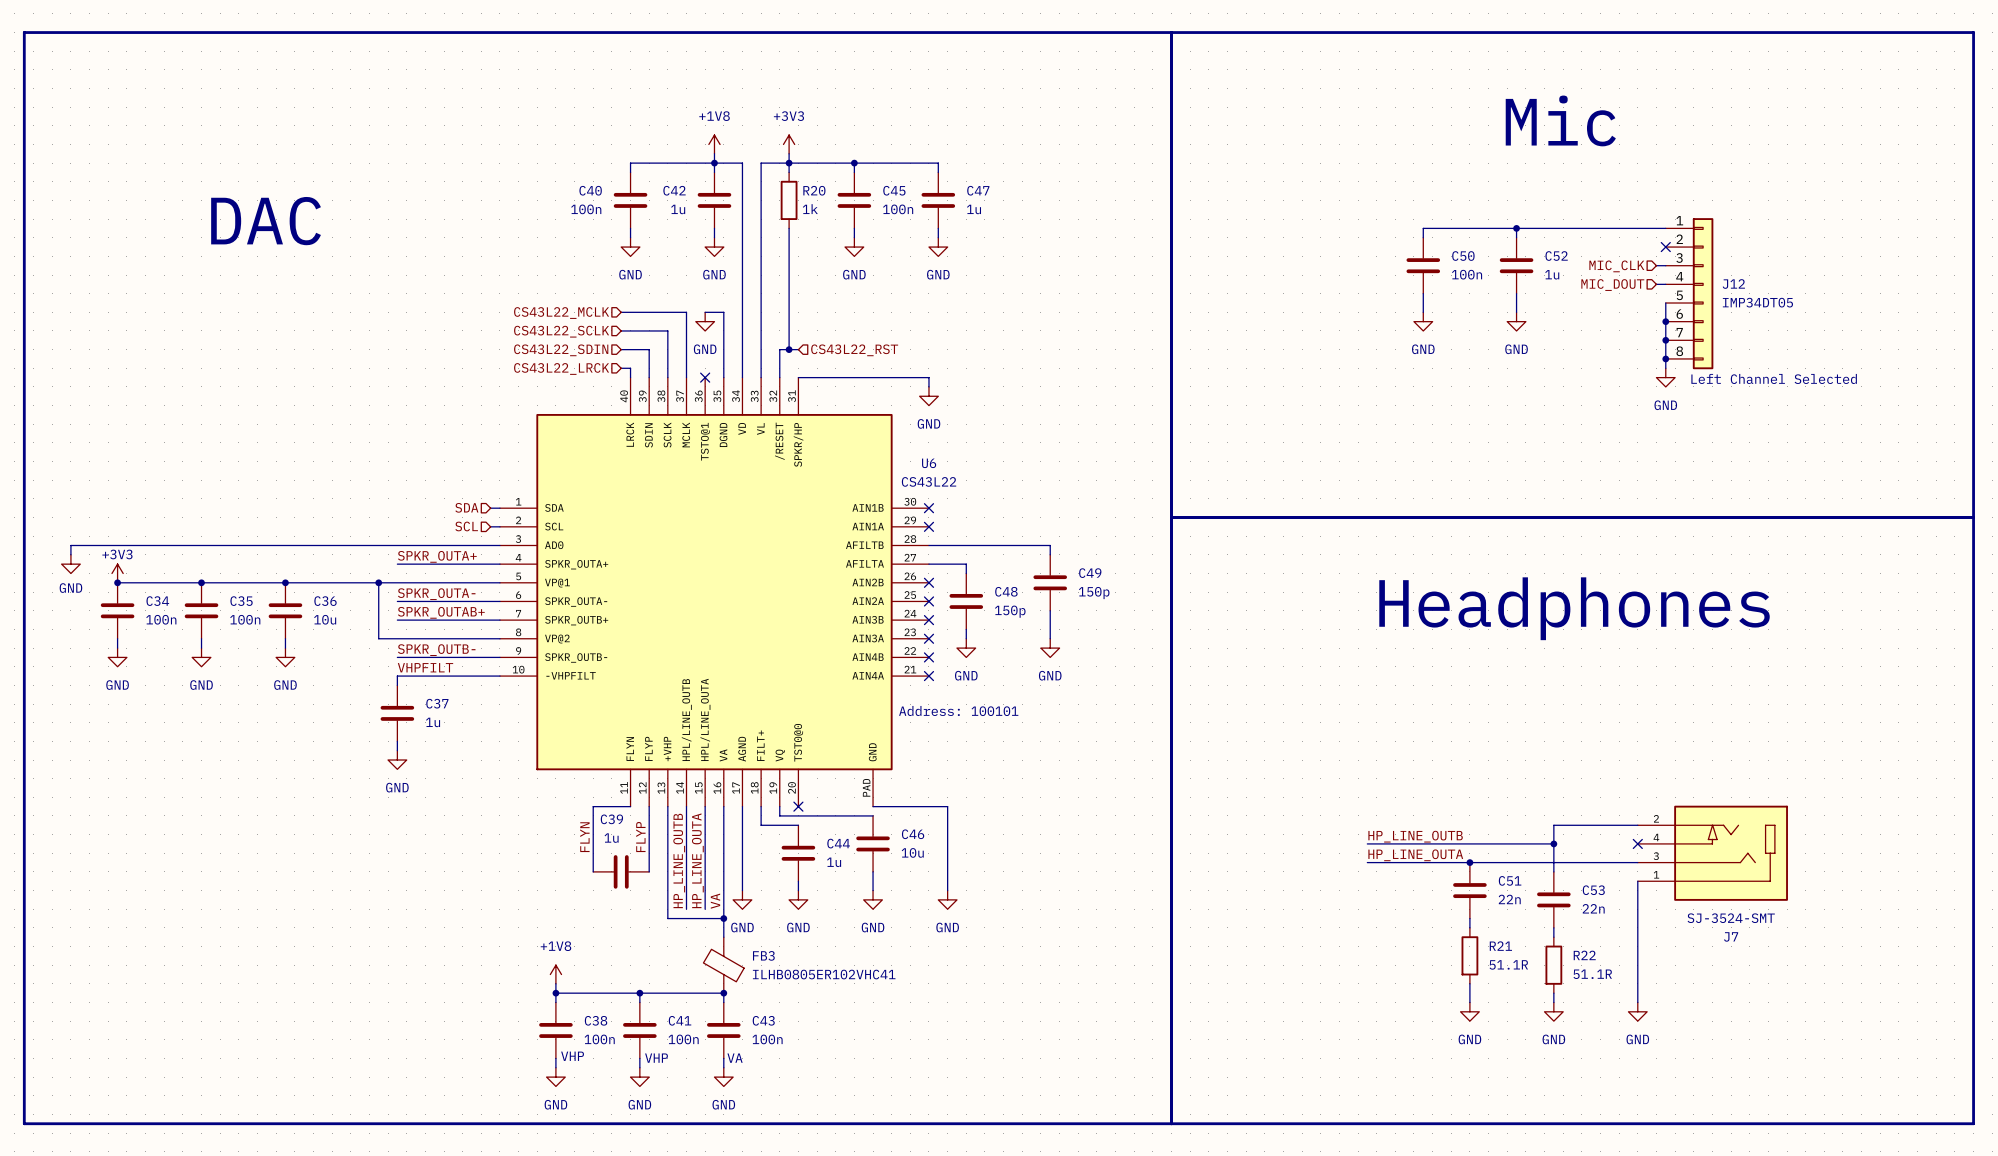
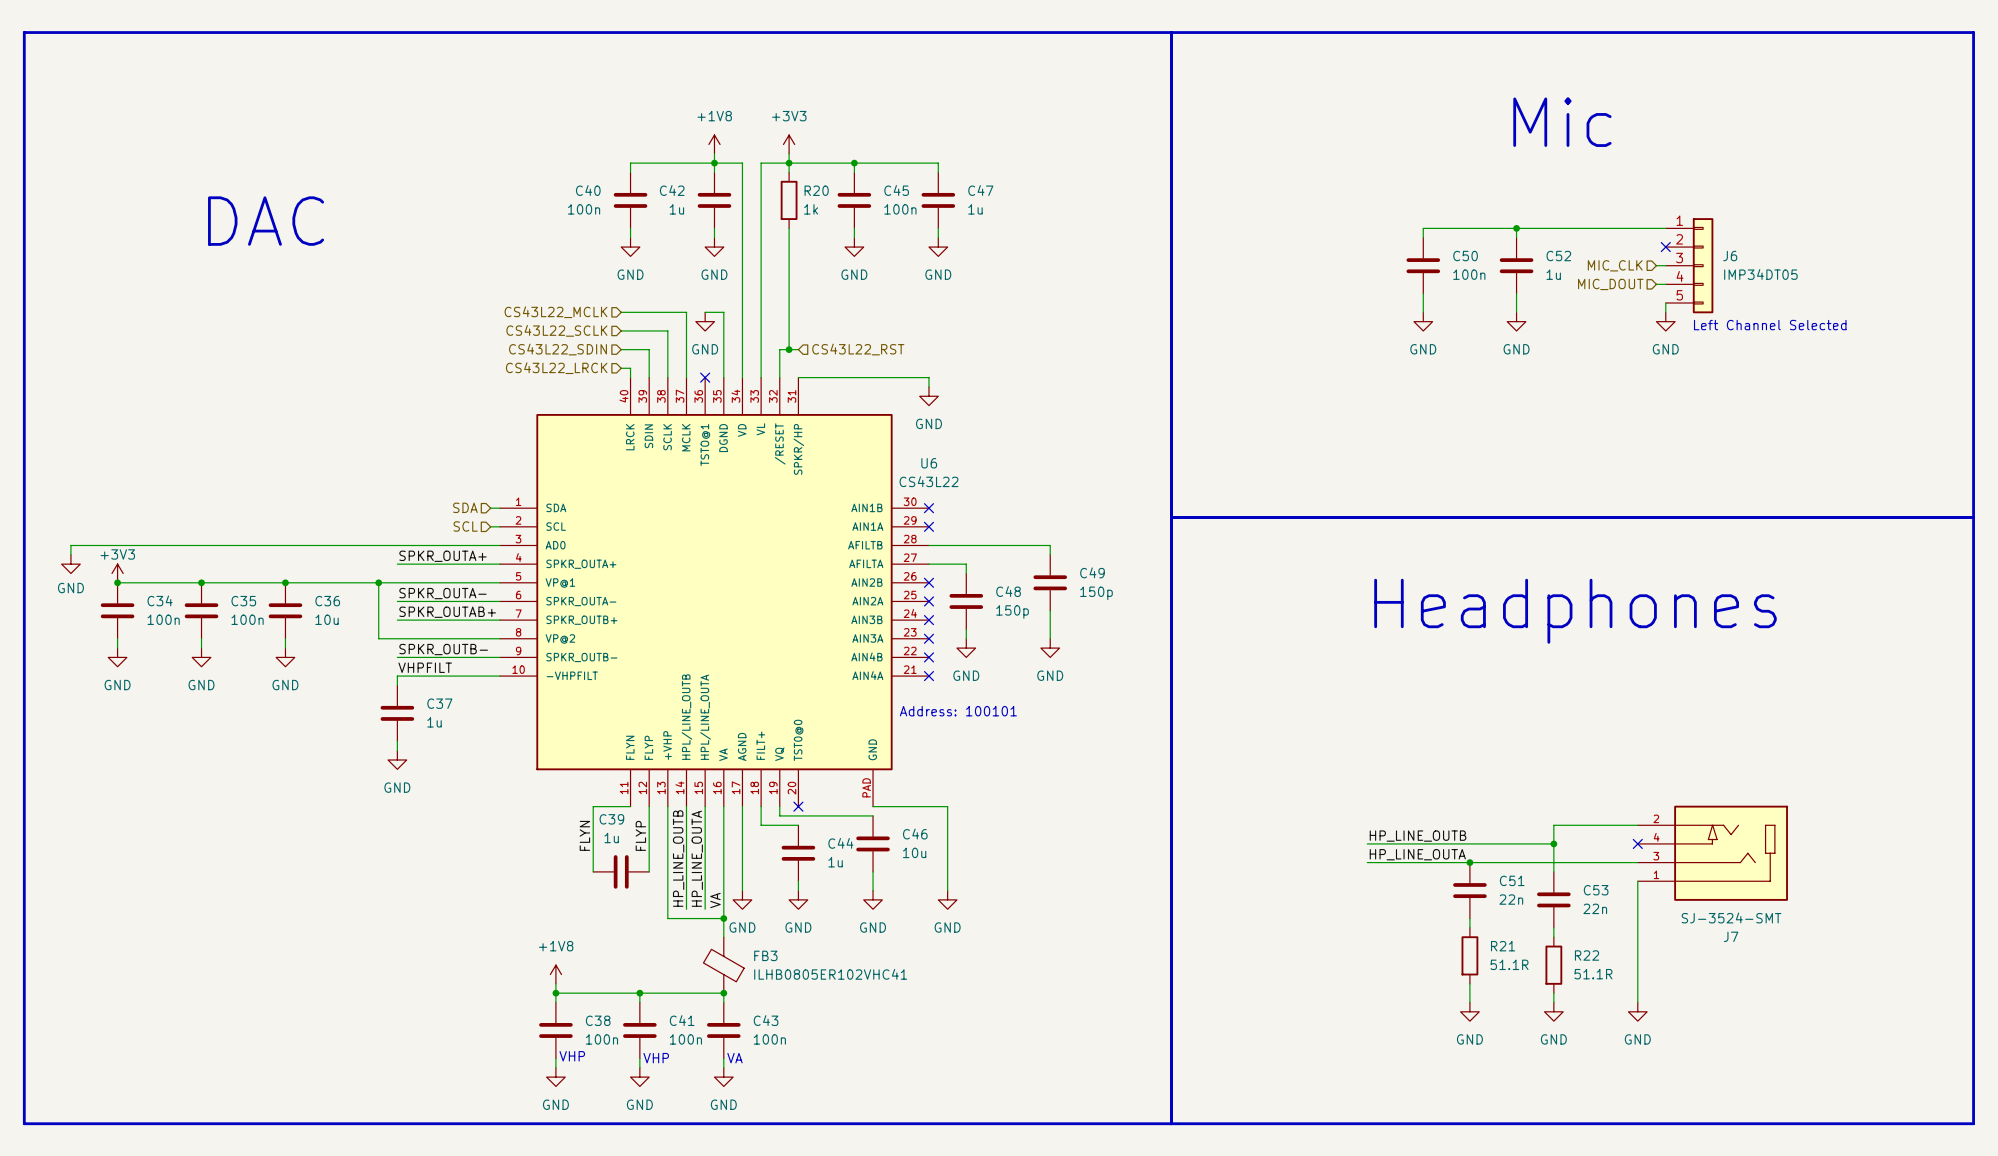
J6: none -> IMP34DT05 (1689, 265)
J12: IMP34DT05 (1689, 293) -> none
wire: (1665, 312) (1665, 368) -> none
junction: (1665, 321) -> none
junction: (1665, 340) -> none
junction: (1665, 358) -> none
power symbol position: GND (1665, 377) -> GND (1665, 321)
text position: Left Channel Selected (1774, 378) -> Left Channel Selected (1770, 325)

